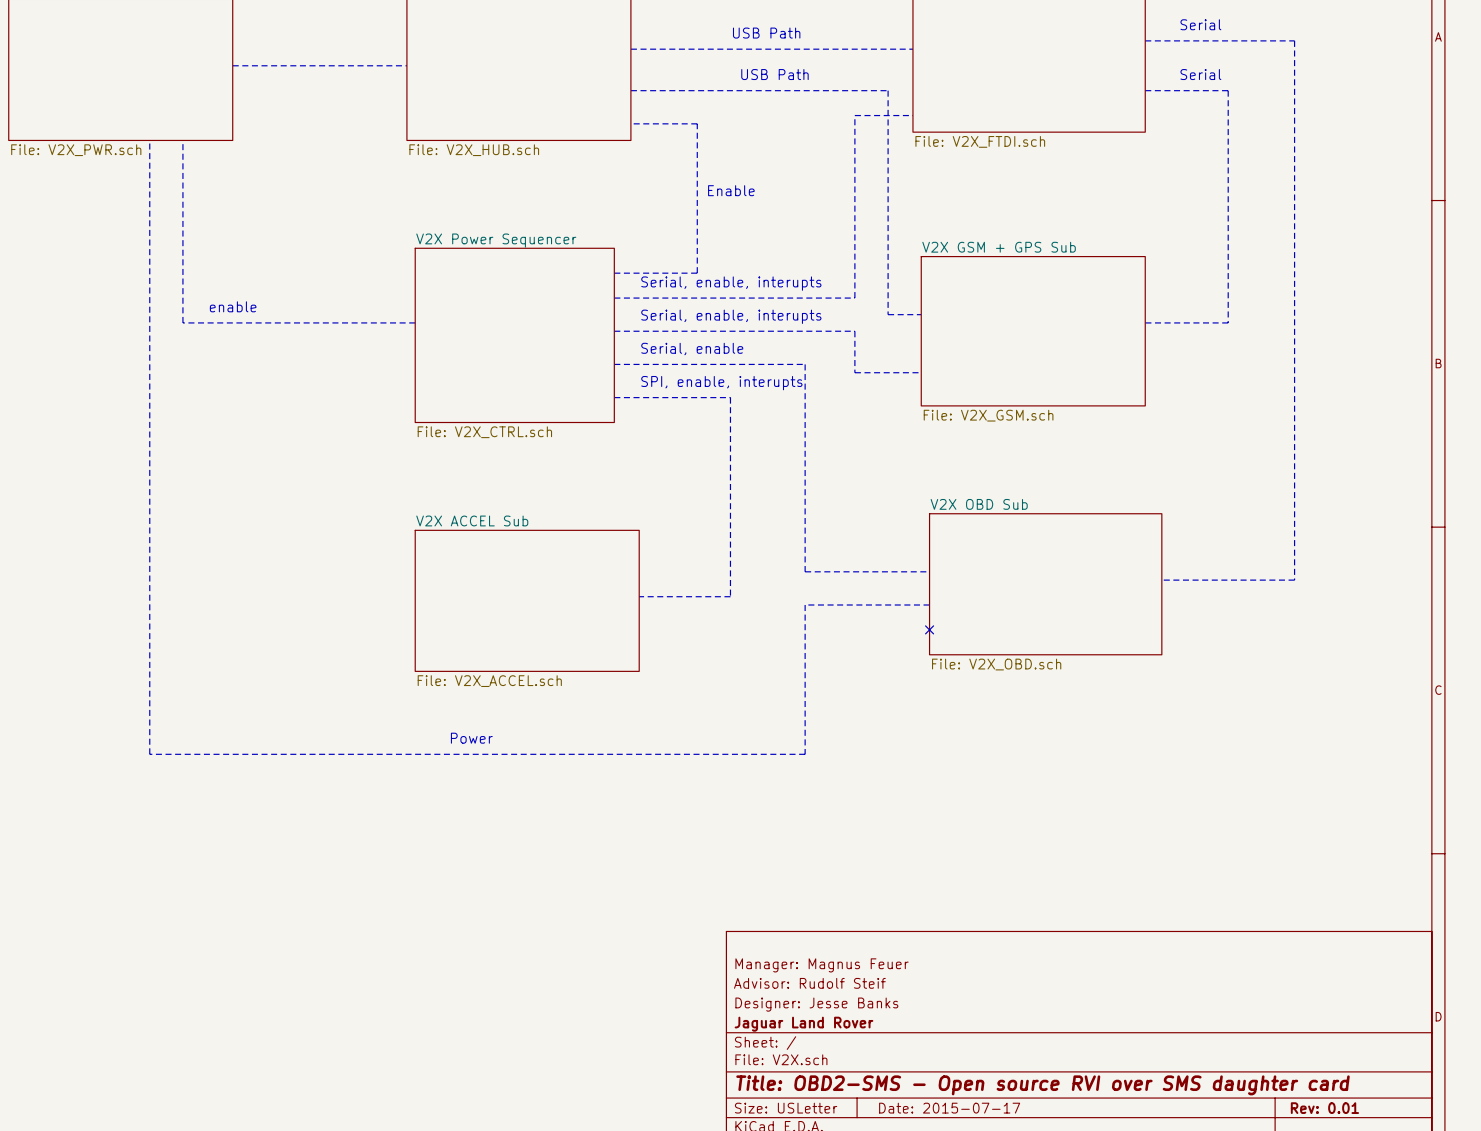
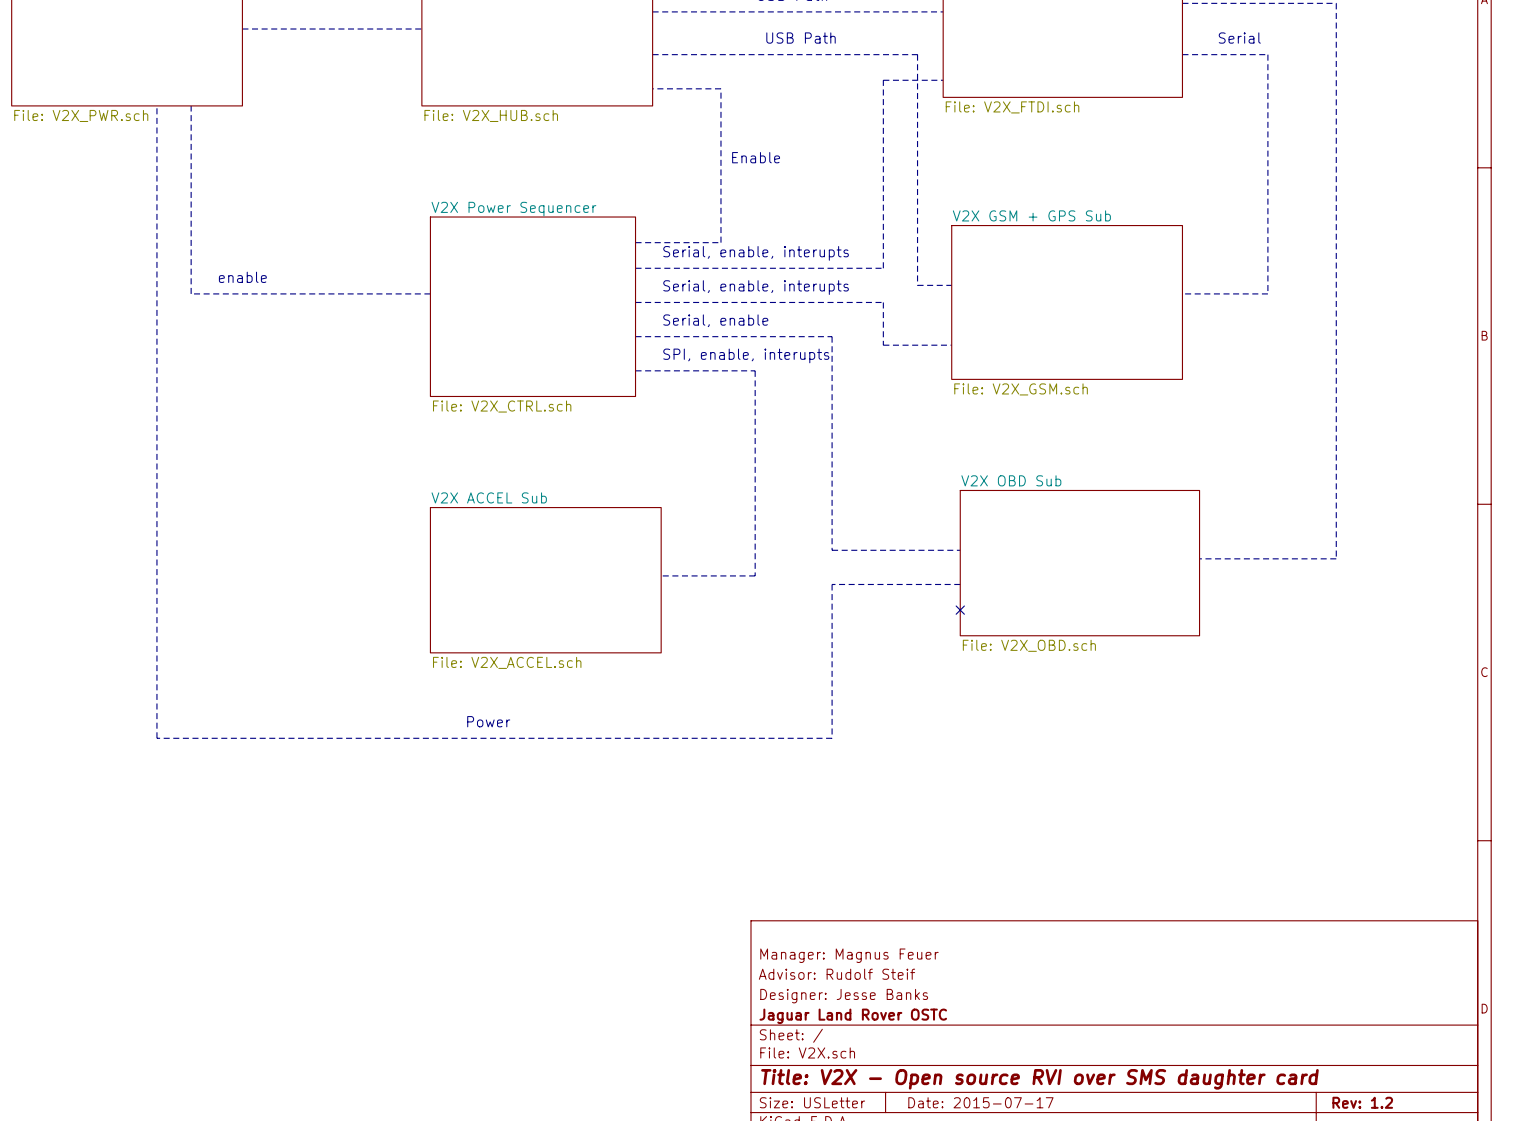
title block: Jaguar Land Rover (803, 1024) -> Jaguar Land Rover OSTC (853, 1016)
title block: Title: OBD2-SMS - Open source RVI over SMS daughter card (1042, 1085) -> Title: V2X - Open source RVI over SMS daughter card (1039, 1079)
title block: Rev: 0.01 (1324, 1108) -> Rev: 1.2 (1362, 1102)

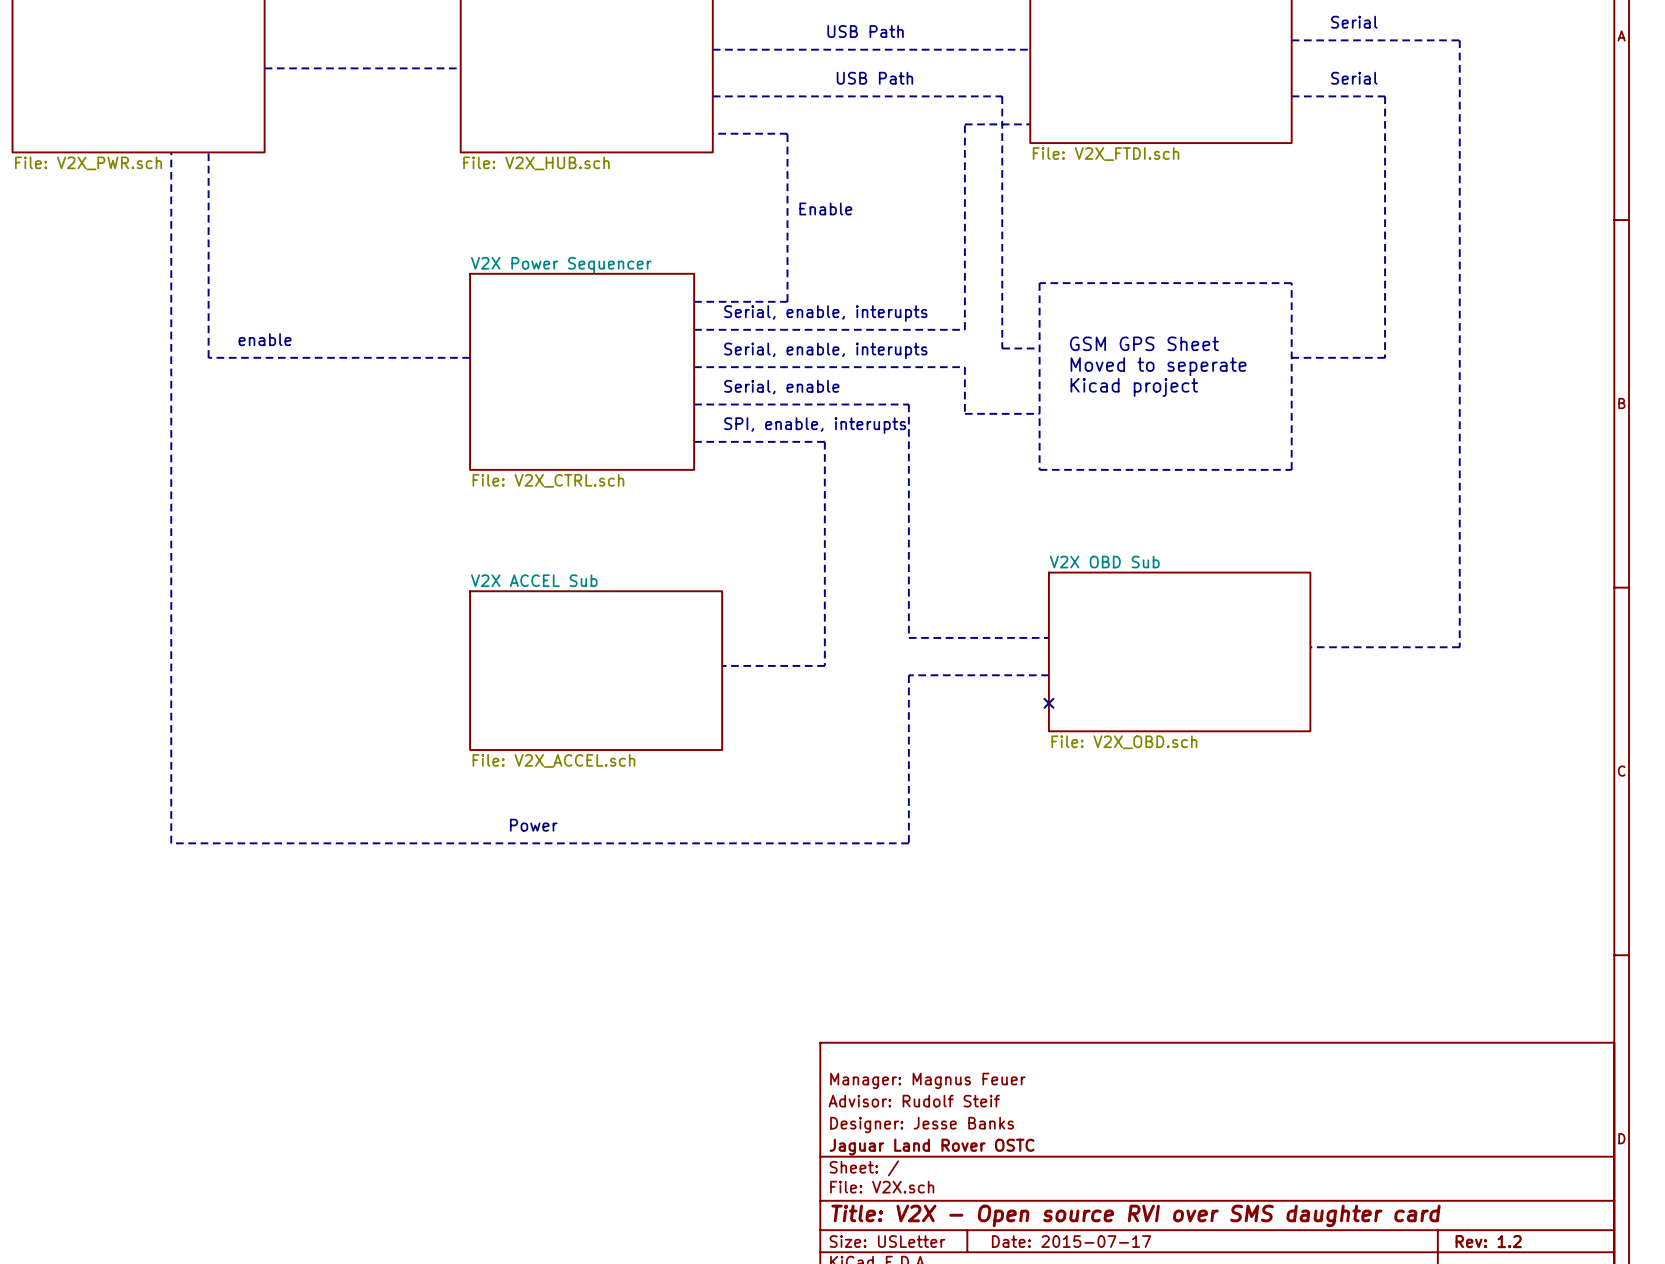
line: none -> (1039, 283) (1039, 469) (1291, 469) (1291, 283) (1039, 283)
text: none -> GSM GPS Sheet (1144, 343)
text: none -> Moved to seperate (1158, 366)
sheet V2X GSM + GPS Sub: File: V2X_GSM.sch (1067, 302) -> none
text: none -> Kicad project (1134, 387)

